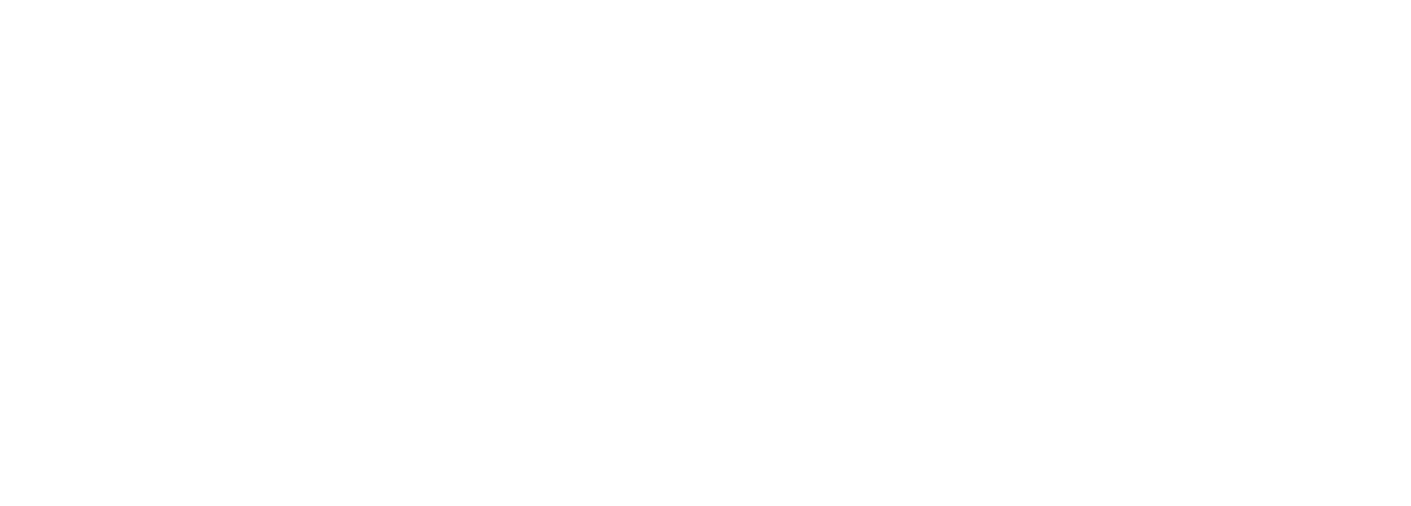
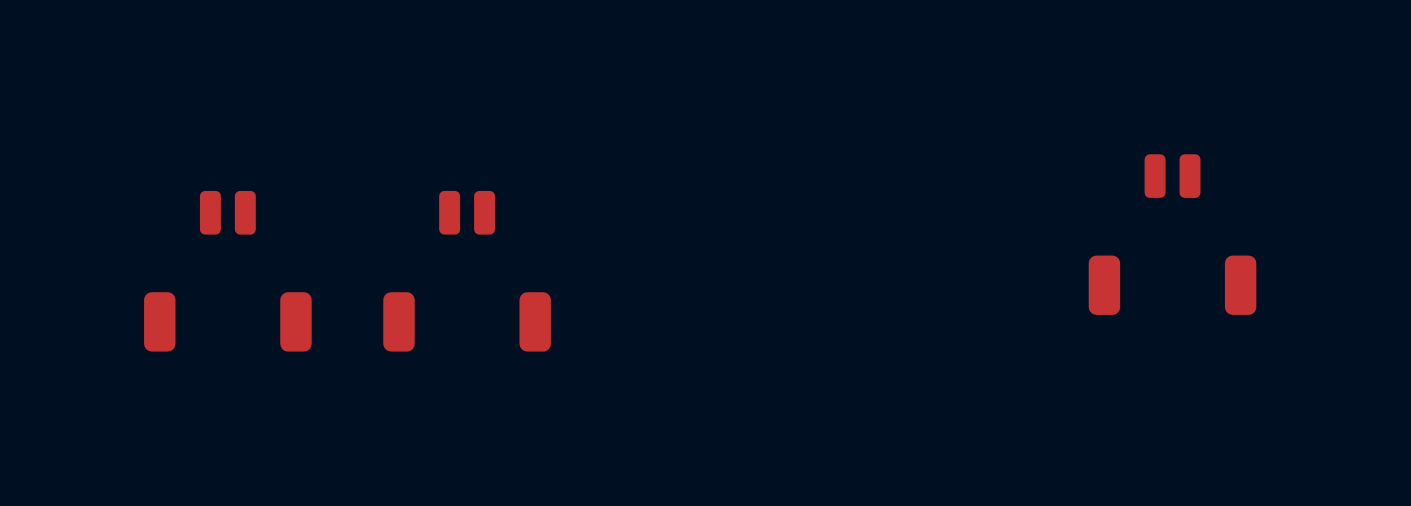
part: none -> (1172, 234)
part: none -> (227, 271)
part: none -> (467, 271)

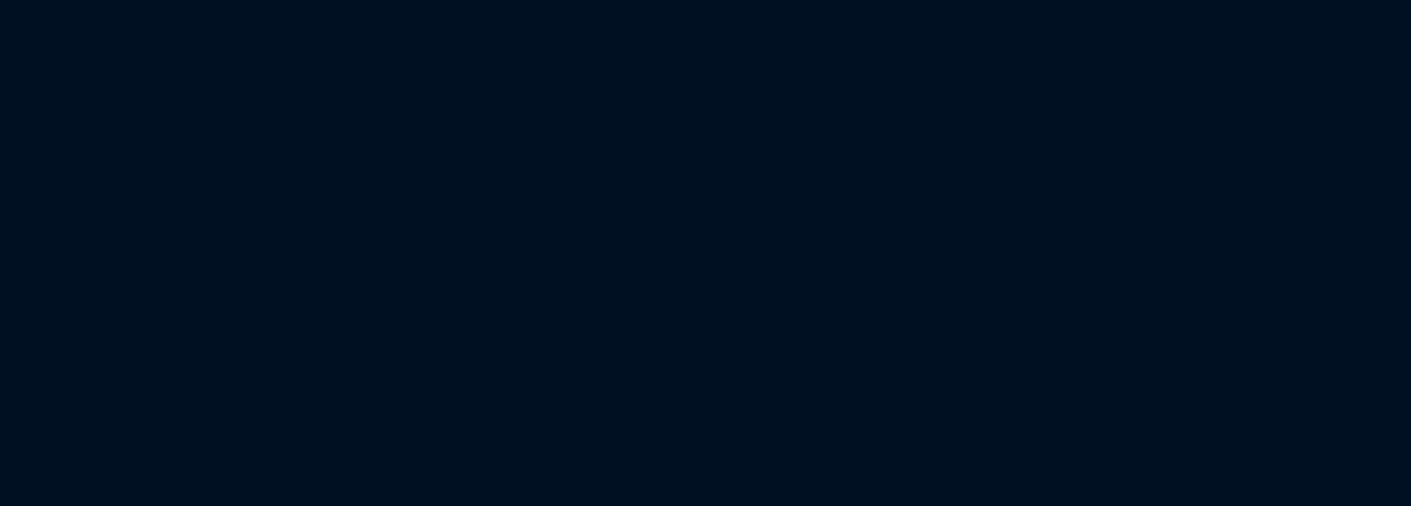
part: (1172, 234) -> none
part: (227, 271) -> none
part: (467, 271) -> none

